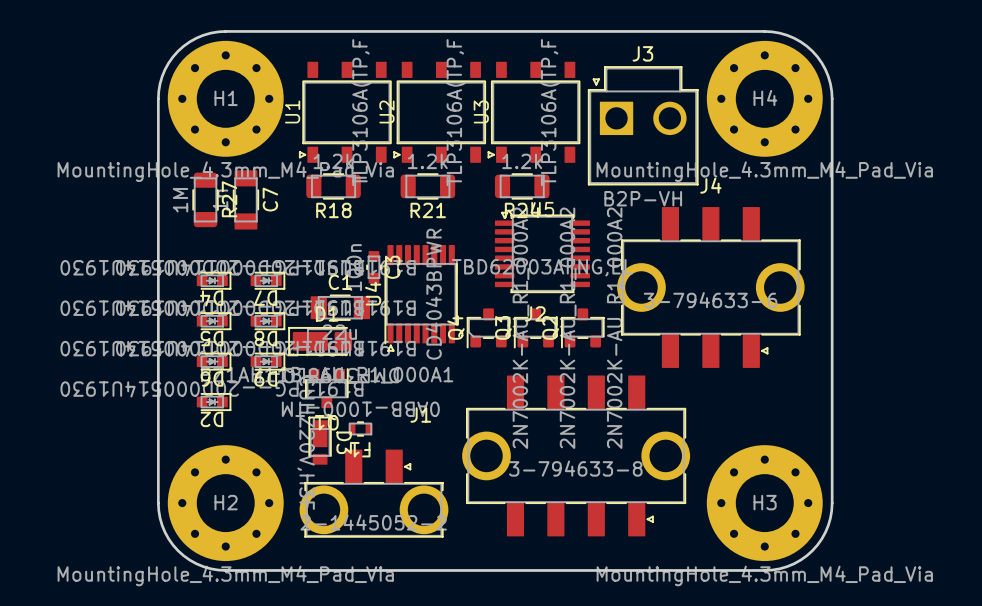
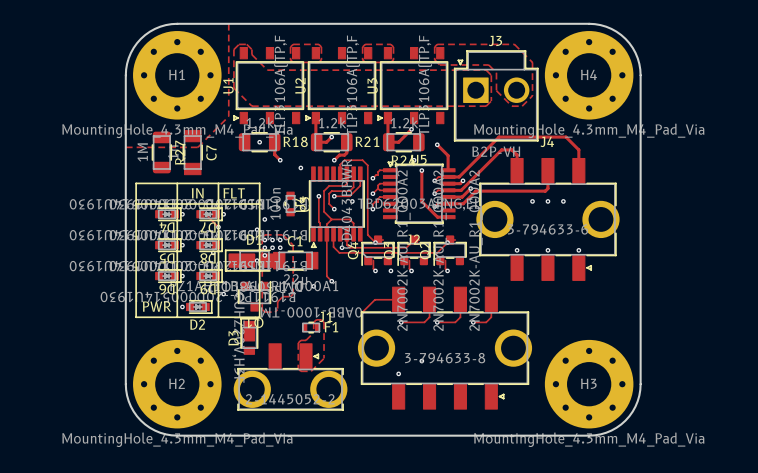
zone outline: none -> (228, 23) (228, 116) (197, 147) (125, 147)
zone outline: none -> (239, 44) (246, 44) (251, 49) (251, 54) (267, 70) (486, 70) (491, 75) (491, 101) (486, 106) (251, 106) (233, 88) (233, 49) (239, 44)
zone outline: none -> (293, 44) (318, 44) (321, 46) (321, 59) (318, 62) (293, 62) (290, 59) (290, 46) (293, 44)
zone outline: none -> (365, 44) (362, 46) (362, 59) (365, 62) (390, 62) (393, 59) (393, 46) (390, 44) (365, 44)
zone outline: none -> (437, 44) (514, 44) (532, 62) (532, 95) (522, 106) (511, 106) (496, 90) (496, 72) (488, 65) (439, 65) (434, 59) (434, 46) (437, 44)
track: none -> (315, 118) (315, 141) (326, 142) (331, 137)
track: none -> (387, 118) (388, 142) (398, 142) (411, 129)
via: none -> (411, 129)
via: none -> (331, 137)
via: none -> (259, 142)
track: none -> (274, 142) (274, 154) (280, 160)
track: none -> (346, 142) (346, 152) (339, 155) (334, 160)
track: none -> (437, 144) (448, 155) (448, 170)
via: none -> (437, 144)
R18 name position: R18 (333, 210) -> R18 (295, 141)
via: none -> (280, 160)
R21 name position: R21 (428, 210) -> R21 (367, 141)
via: none -> (334, 160)
via: none -> (414, 160)
via: none -> (300, 167)
track: none -> (390, 170) (379, 170) (378, 175) (372, 178)
track: none -> (421, 170) (421, 201) (437, 217) (448, 217)
via: none -> (421, 170)
track: none -> (517, 171) (517, 155) (511, 149) (501, 149) (461, 190) (438, 190) (434, 193)
track: none -> (547, 171) (547, 188) (545, 191) (475, 191) (463, 203) (437, 203) (434, 206)
track: none -> (578, 171) (578, 149) (565, 137) (499, 137) (459, 176) (438, 176) (434, 180)
track: none -> (340, 174) (340, 164) (344, 160) (362, 160) (367, 165) (367, 234) (375, 242) (378, 240) (383, 240)
track: none -> (346, 174) (346, 183) (344, 185) (329, 185) (324, 191) (324, 211) (331, 219)
track: none -> (353, 174) (353, 187) (349, 191) (331, 191) (329, 193) (329, 204) (334, 209)
track: none -> (360, 174) (360, 185) (349, 196) (334, 196)
via: none -> (372, 178)
via: none -> (434, 180)
track: none -> (463, 180) (460, 183) (448, 183)
via: none -> (463, 180)
line: none -> (136, 183) (259, 183) (259, 317) (136, 317) (136, 183)
line: none -> (177, 183) (177, 317)
line: none -> (218, 183) (218, 317)
track: none -> (390, 183) (379, 183) (378, 188)
track: none -> (378, 188) (379, 190) (390, 190)
track: none -> (378, 188) (372, 193)
track: none -> (470, 188) (462, 197) (448, 197)
via: none -> (470, 188)
text: none -> IN (197, 193)
text: none -> FLT (234, 193)
via: none -> (372, 193)
via: none -> (434, 193)
track: none -> (318, 196) (320, 233)
via: none -> (318, 196)
via: none -> (334, 196)
track: none -> (390, 197) (379, 197) (378, 201) (372, 204) (372, 209)
via: none -> (352, 201)
via: none -> (532, 201)
via: none -> (547, 201)
via: none -> (563, 201)
line: none -> (136, 204) (259, 204)
via: none -> (434, 206)
via: none -> (334, 209)
via: none -> (372, 209)
via: none -> (182, 214)
track: none -> (205, 214) (218, 227)
via: none -> (223, 214)
via: none -> (264, 219)
track: none -> (331, 219) (326, 224) (326, 276) (331, 281)
track: none -> (331, 219) (349, 219) (353, 223) (353, 233)
via: none -> (218, 227)
U4 position: (421, 298) -> (336, 207)
via: none -> (257, 229)
track: none -> (333, 233) (333, 246) (339, 252) (437, 252) (450, 240) (455, 240)
track: none -> (346, 233) (346, 244) (349, 247) (406, 247) (414, 240) (419, 240)
zone outline: none -> (264, 234) (282, 234) (293, 245) (293, 294) (290, 296) (282, 296) (277, 301) (277, 309) (275, 312) (264, 312) (262, 309) (262, 237) (264, 234)
C1 position: (340, 307) -> (295, 260)
via: none -> (264, 240)
via: none -> (272, 240)
via: none -> (280, 240)
via: none -> (375, 242)
via: none -> (447, 242)
via: none -> (182, 245)
via: none -> (264, 247)
via: none -> (272, 247)
via: none -> (280, 247)
via: none -> (342, 247)
via: none -> (517, 250)
via: none -> (547, 250)
via: none -> (578, 250)
via: none -> (213, 252)
via: none -> (264, 255)
via: none -> (257, 260)
track: none -> (373, 260) (373, 268) (375, 270)
track: none -> (409, 260) (409, 268) (411, 270)
track: none -> (445, 260) (445, 268) (447, 270)
via: none -> (375, 270)
via: none -> (390, 270)
via: none -> (411, 270)
via: none -> (447, 270)
via: none -> (182, 276)
via: none -> (331, 281)
via: none -> (313, 286)
via: none -> (223, 294)
track: none -> (398, 299) (374, 299) (362, 312)
track: none -> (429, 299) (429, 317) (424, 322) (401, 322)
track: none -> (460, 299) (460, 317) (455, 322) (437, 322)
track: none -> (491, 299) (491, 317) (486, 322) (473, 322)
text: none -> PWR (157, 306)
D2 position: (214, 402) -> (199, 306)
via: none -> (182, 306)
zone outline: none -> (316, 319) (321, 319) (324, 322) (324, 358) (311, 371) (300, 371) (298, 368) (298, 342) (300, 340) (306, 340) (313, 332) (313, 322) (316, 319)
D2 name rotation: 0° (211, 419) -> 180° (197, 324)
via: none -> (401, 322)
via: none -> (437, 322)
via: none -> (473, 322)
F1 position: (360, 428) -> (311, 327)
D3 name rotation: 0° (344, 442) -> 180° (233, 338)
D3 name position: D3 (344, 442) -> D3 (233, 338)
F1 name rotation: 0° (360, 449) -> 180° (331, 327)
F1 name position: F1 (360, 449) -> F1 (331, 327)
via: none -> (421, 361)
via: none -> (398, 373)

